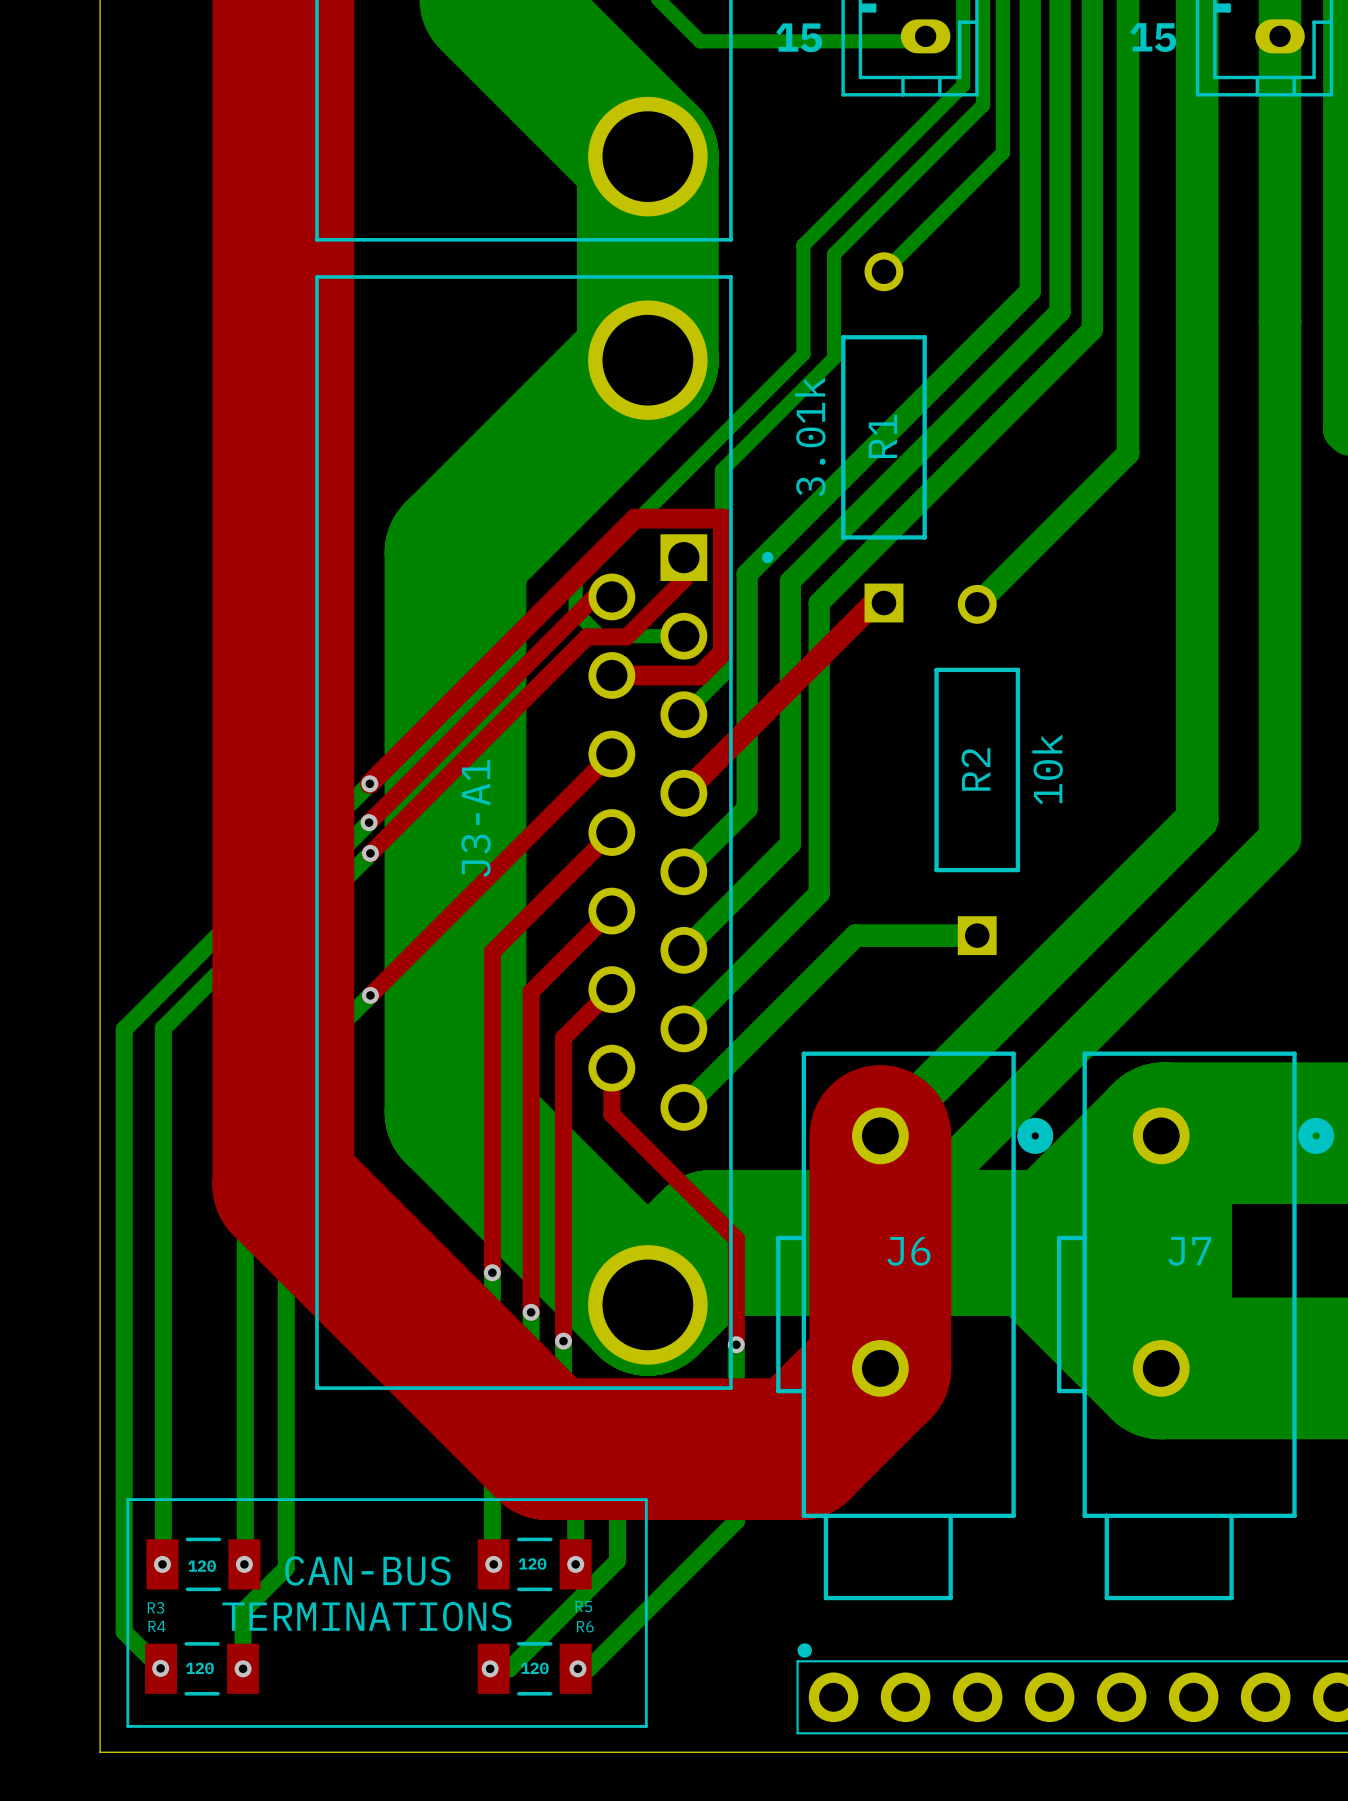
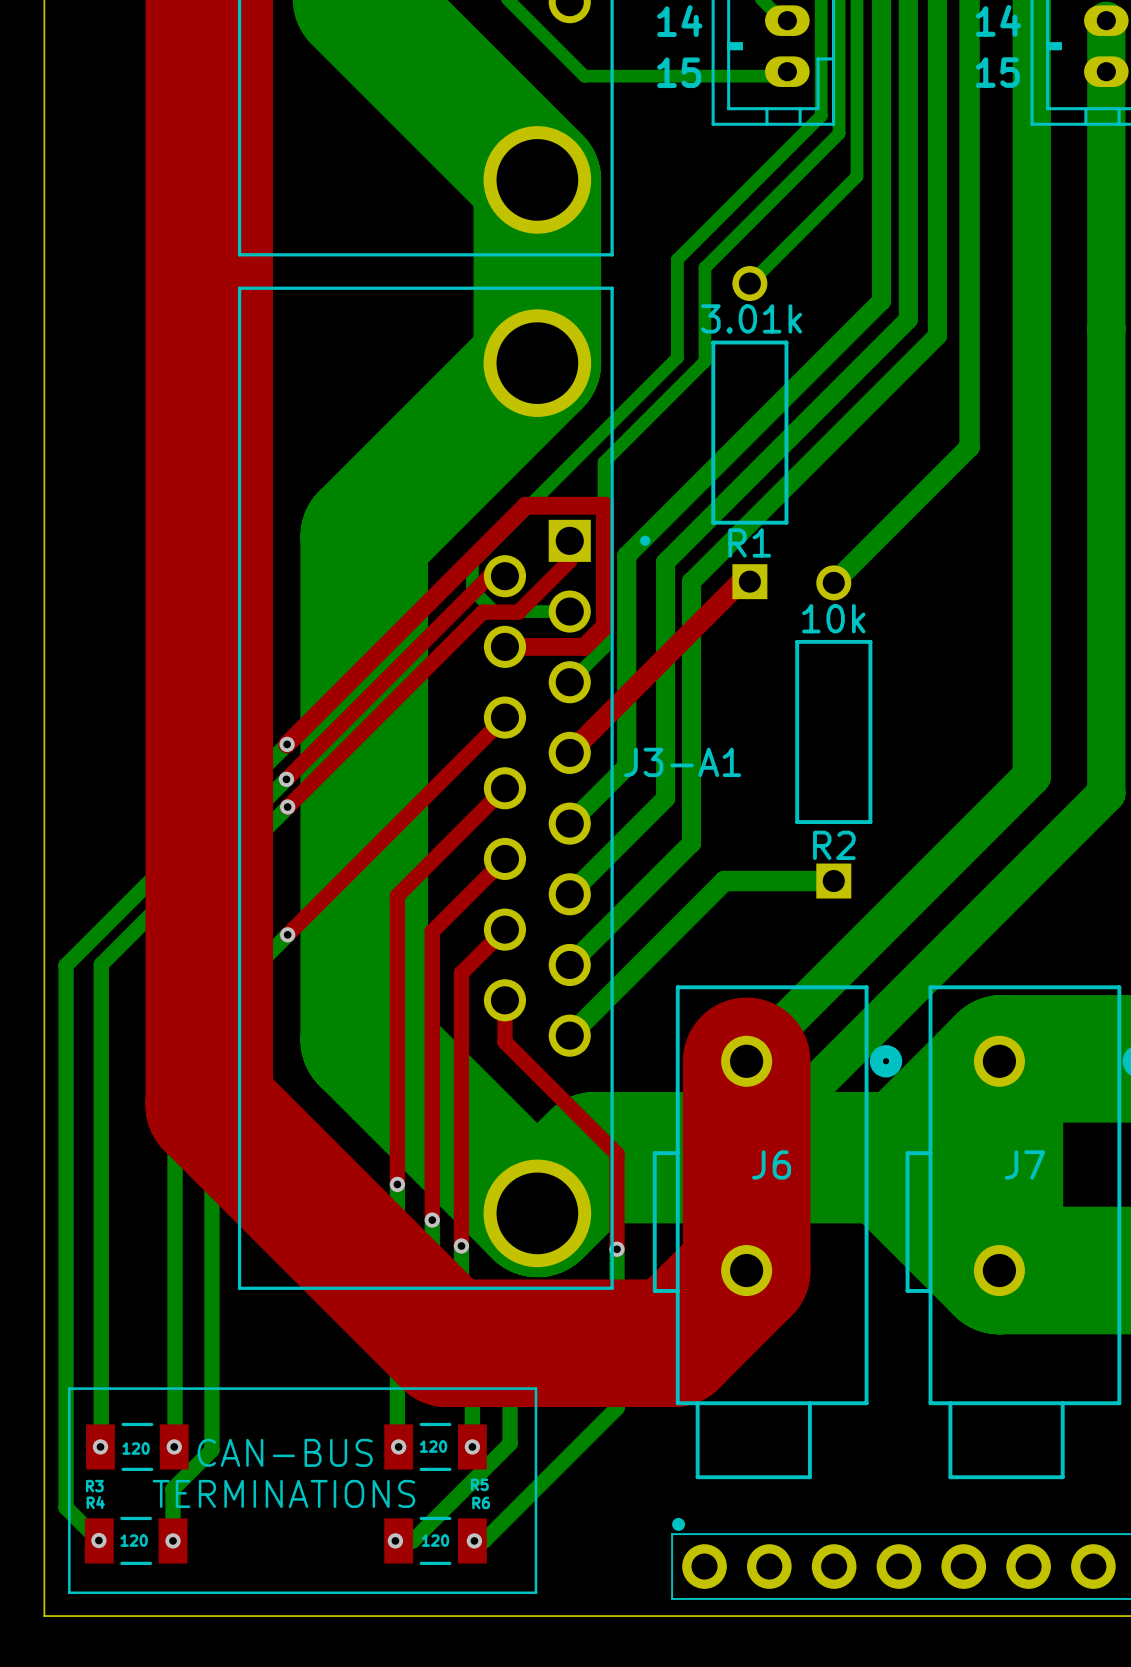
R1 value rotation: 0° (810, 436) -> 90° clockwise (751, 318)
R1 name rotation: 0° (882, 436) -> 90° clockwise (749, 542)
R1 name position: R1 (882, 436) -> R1 (749, 542)
R2 name rotation: 0° (975, 769) -> 90° clockwise (834, 845)
R2 name position: R2 (975, 769) -> R2 (834, 845)
R2 value rotation: 0° (1047, 769) -> 90° clockwise (833, 618)
R2 value position: 10k (1047, 769) -> 10k (833, 618)
J3-A1 name rotation: 0° (476, 818) -> 90° clockwise (682, 762)
J3-A1 name position: J3-A1 (476, 818) -> J3-A1 (682, 762)

